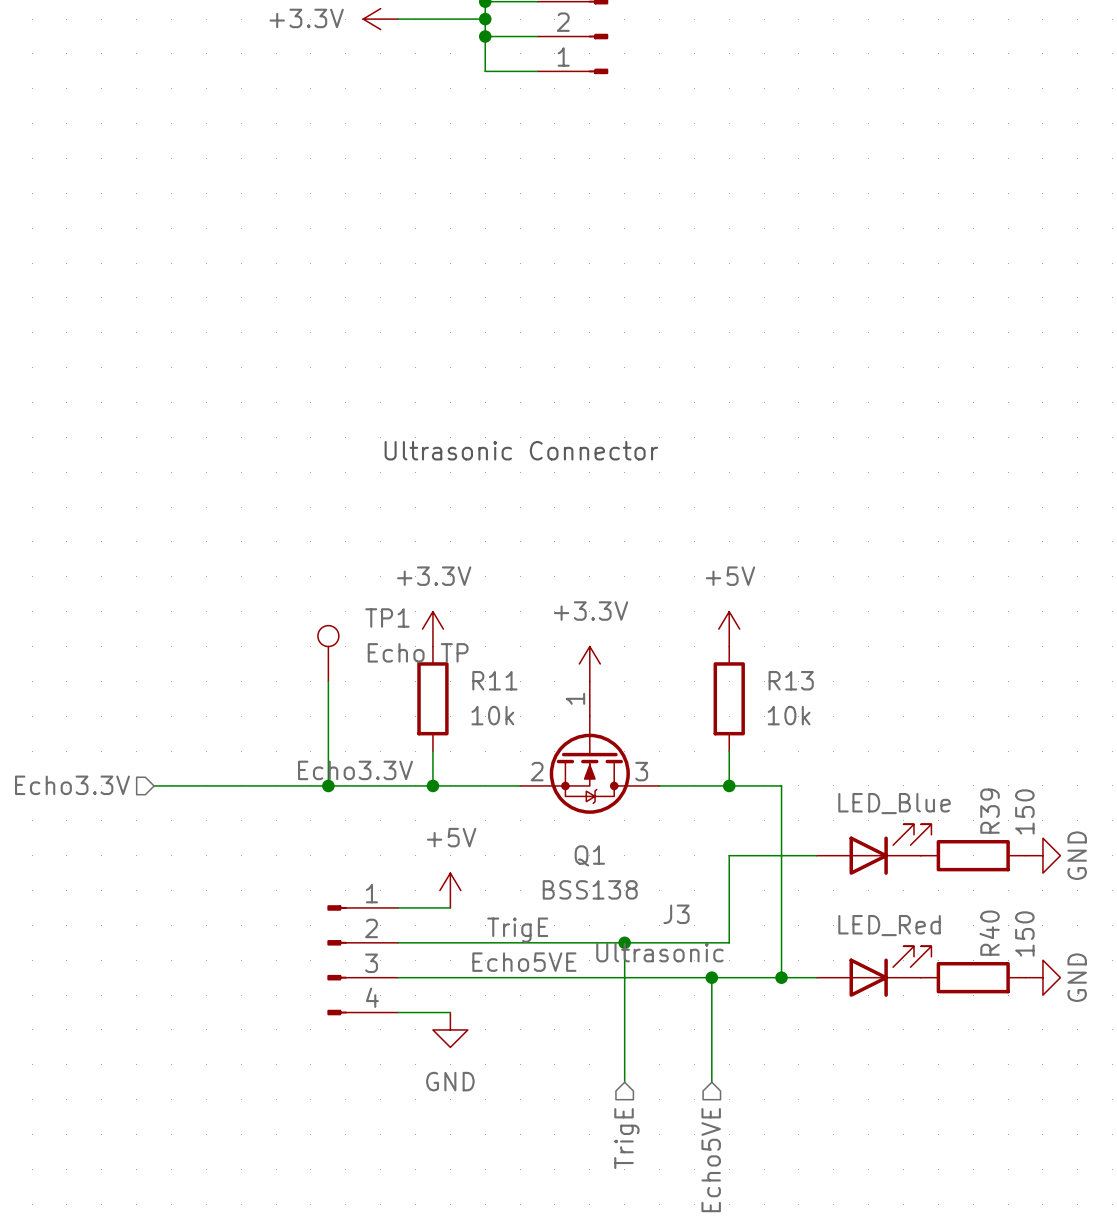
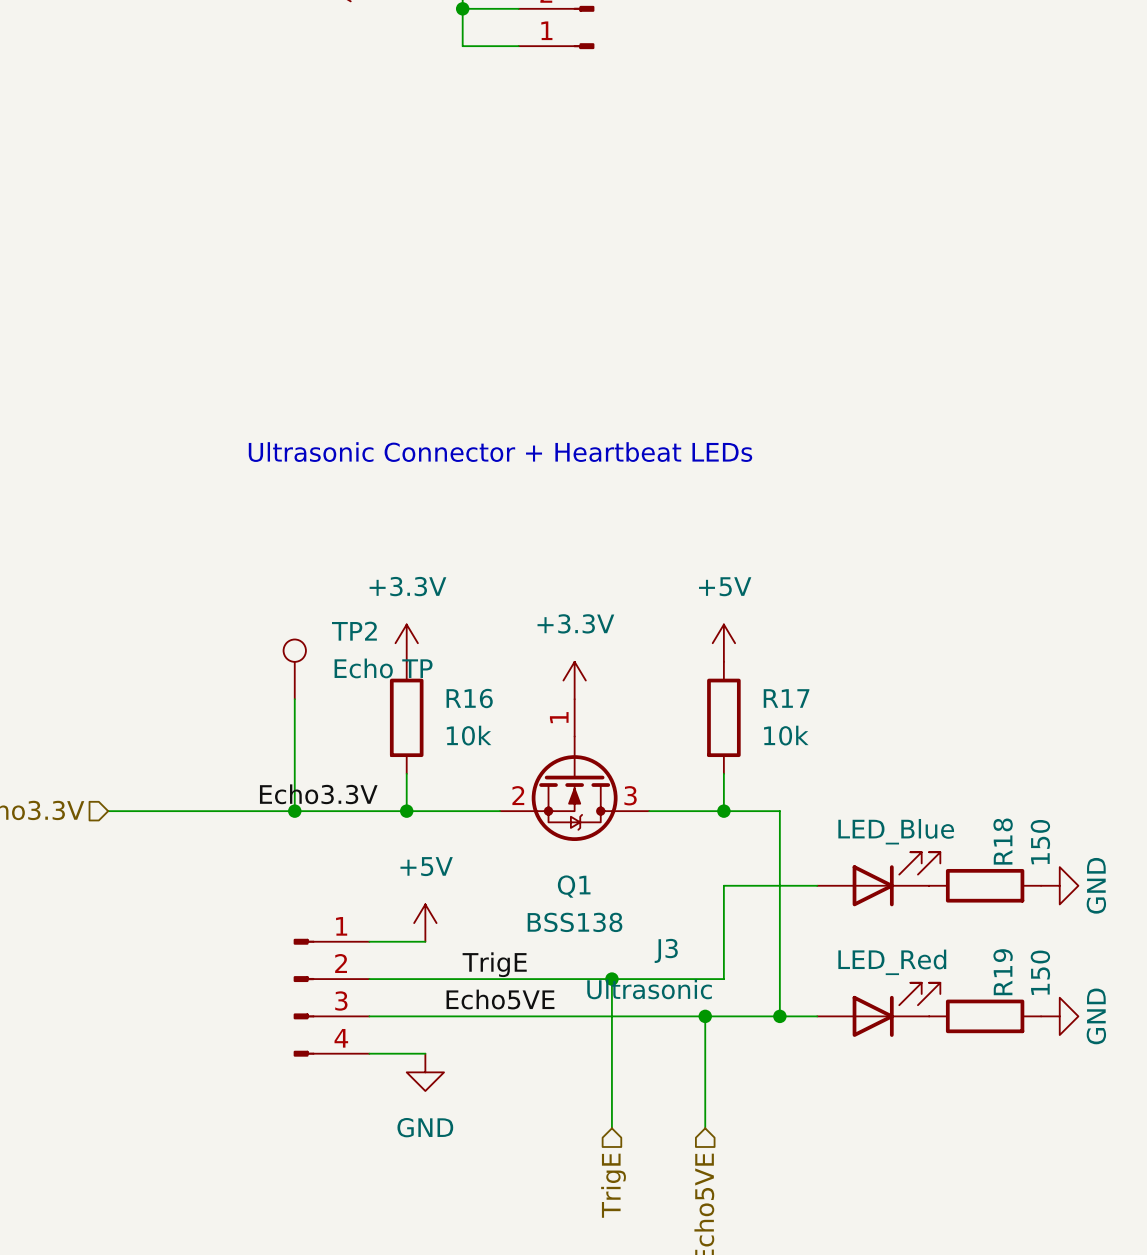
text: Ultrasonic Connector (521, 450) -> Ultrasonic Connector + Heartbeat LEDs (500, 452)
TP1 name: TP1 (387, 617) -> TP2 (354, 631)
R11 name: R11 (494, 680) -> R16 (469, 698)
R13 name: R13 (791, 680) -> R17 (786, 698)
R39 name: R39 (990, 811) -> R18 (1003, 841)
R40 name: R40 (989, 933) -> R19 (1003, 972)

